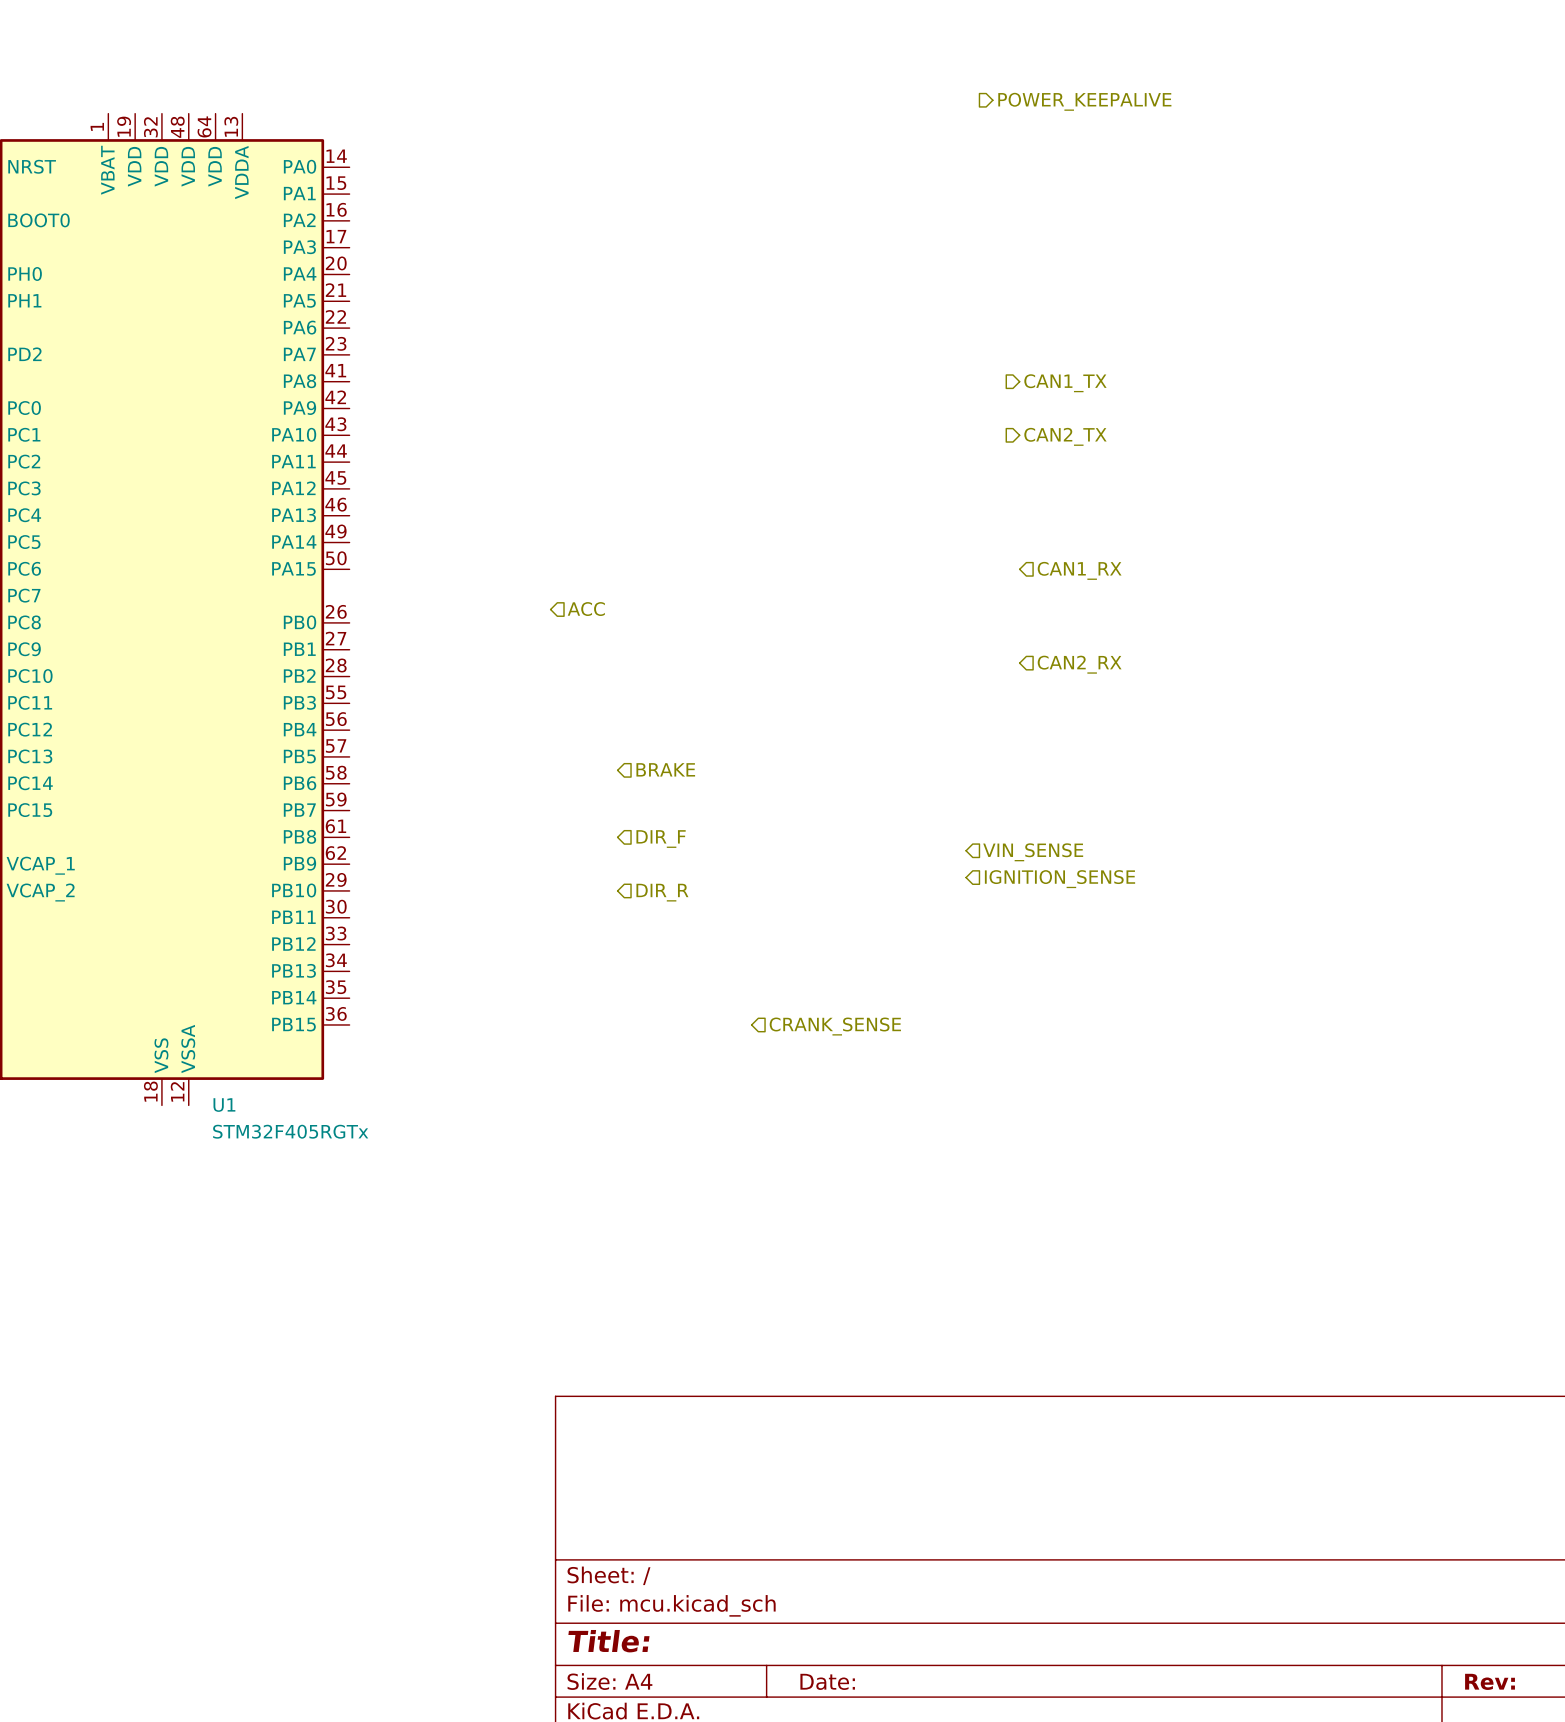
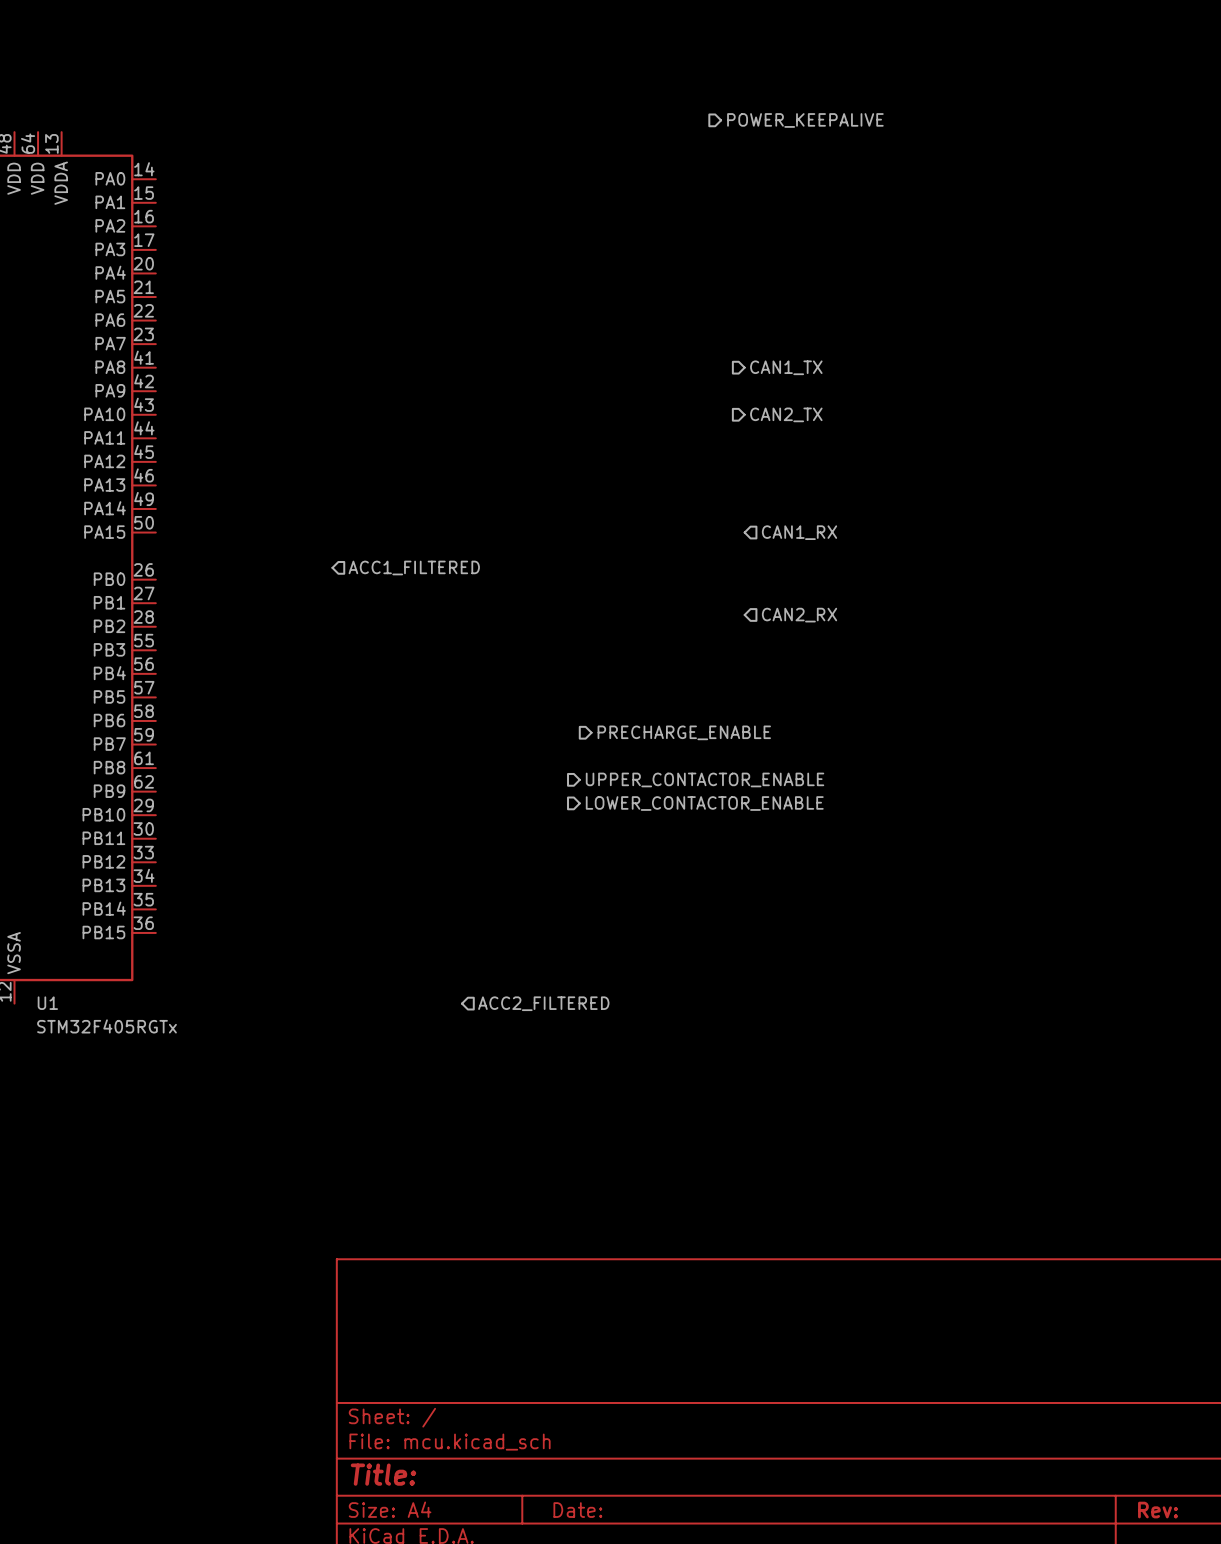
hierarchical label: ACC (586, 609) -> ACC1_FILTERED (414, 567)
hierarchical label: BRAKE (665, 769) -> none
hierarchical label: none -> PRECHARGE_ENABLE (684, 732)
hierarchical label: DIR_F (661, 839) -> none
hierarchical label: none -> UPPER_CONTACTOR_ENABLE (705, 779)
hierarchical label: VIN_SENSE (1033, 852) -> none
hierarchical label: none -> LOWER_CONTACTOR_ENABLE (704, 803)
hierarchical label: IGNITION_SENSE (1060, 879) -> none
hierarchical label: DIR_R (662, 892) -> none
hierarchical label: CRANK_SENSE (835, 1026) -> none
hierarchical label: none -> ACC2_FILTERED (543, 1003)

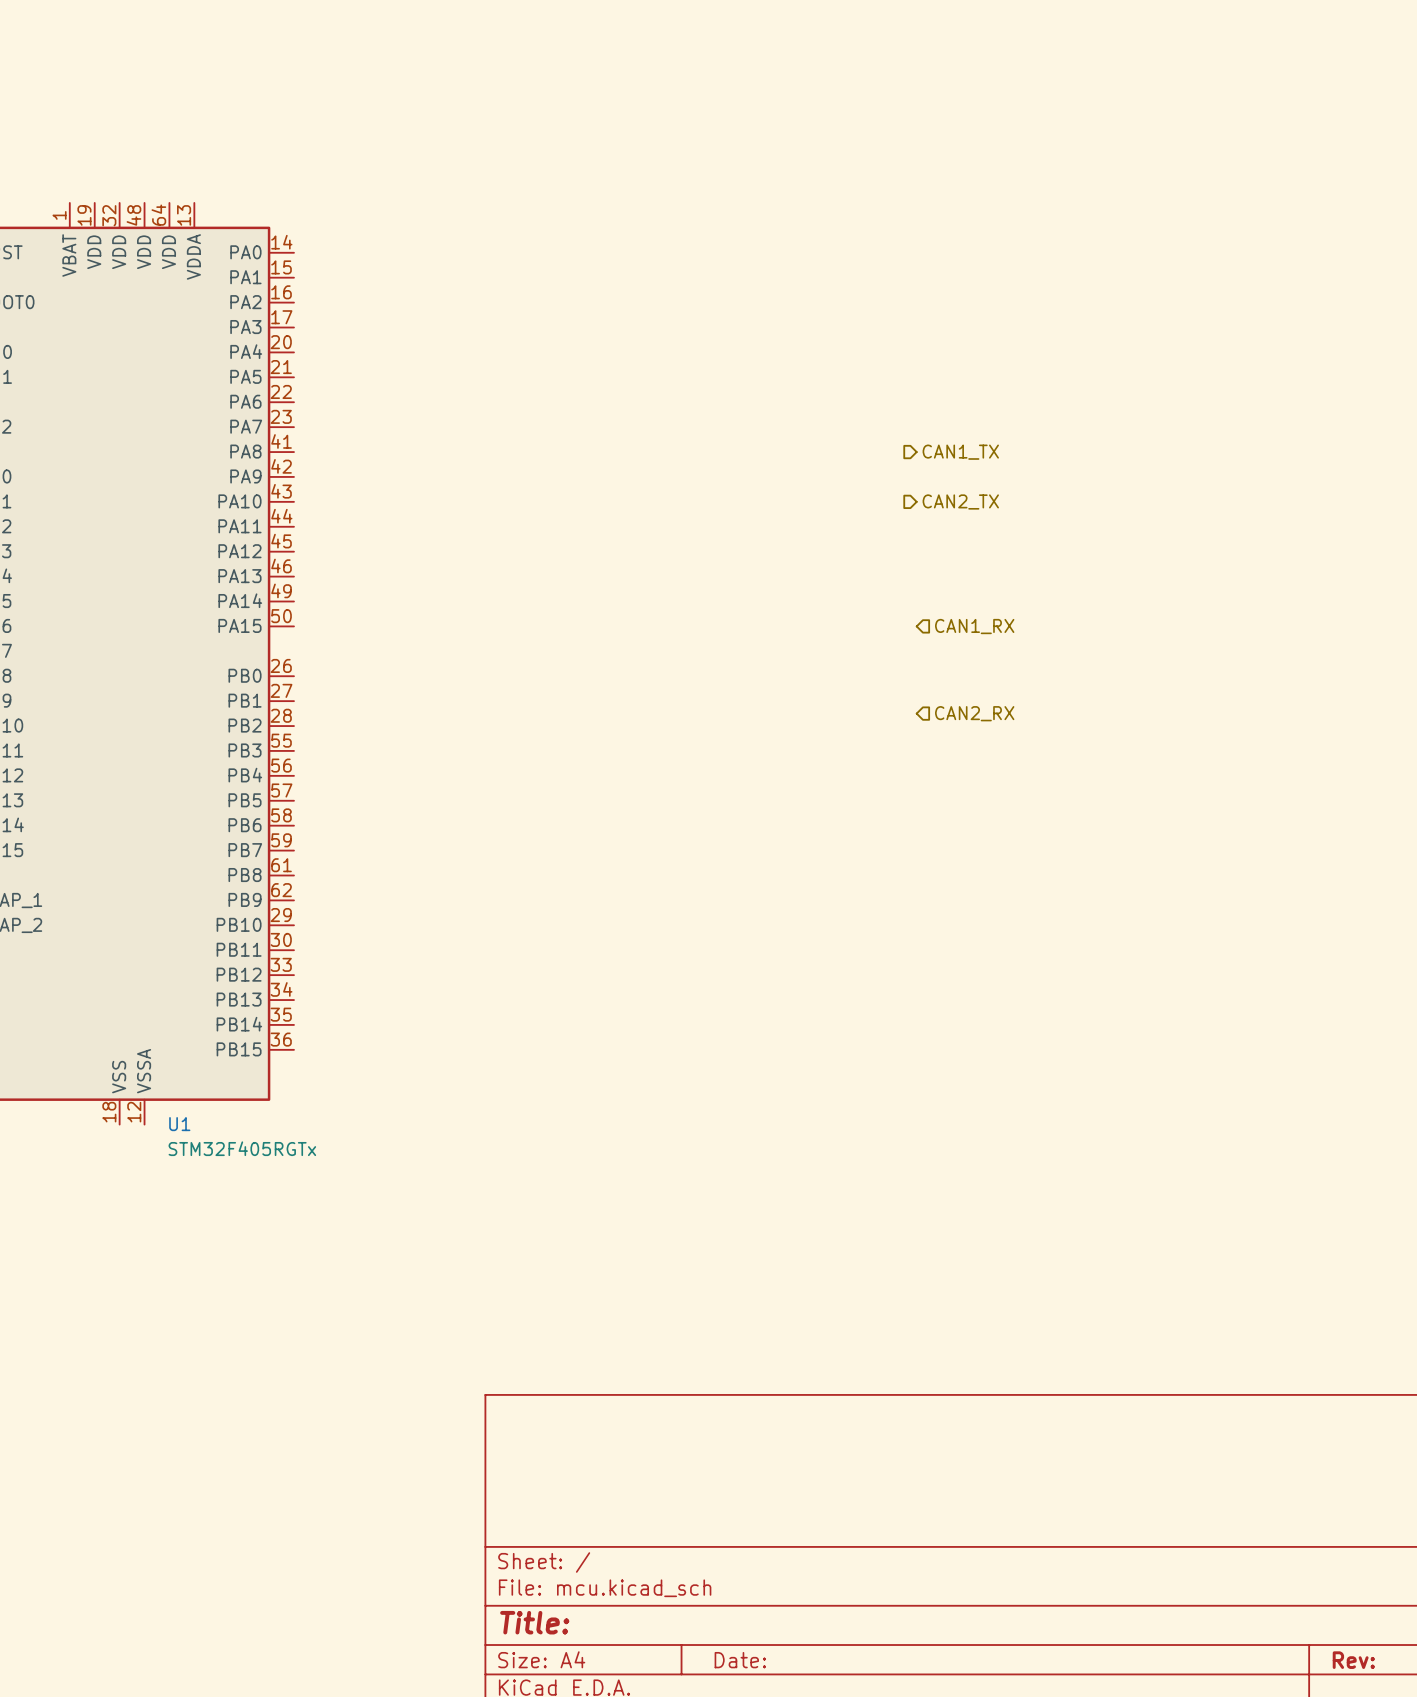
hierarchical label: POWER_KEEPALIVE (805, 120) -> none
hierarchical label: ACC1_FILTERED (414, 567) -> none
hierarchical label: PRECHARGE_ENABLE (684, 732) -> none
hierarchical label: UPPER_CONTACTOR_ENABLE (705, 779) -> none
hierarchical label: LOWER_CONTACTOR_ENABLE (704, 803) -> none
hierarchical label: ACC2_FILTERED (543, 1003) -> none

